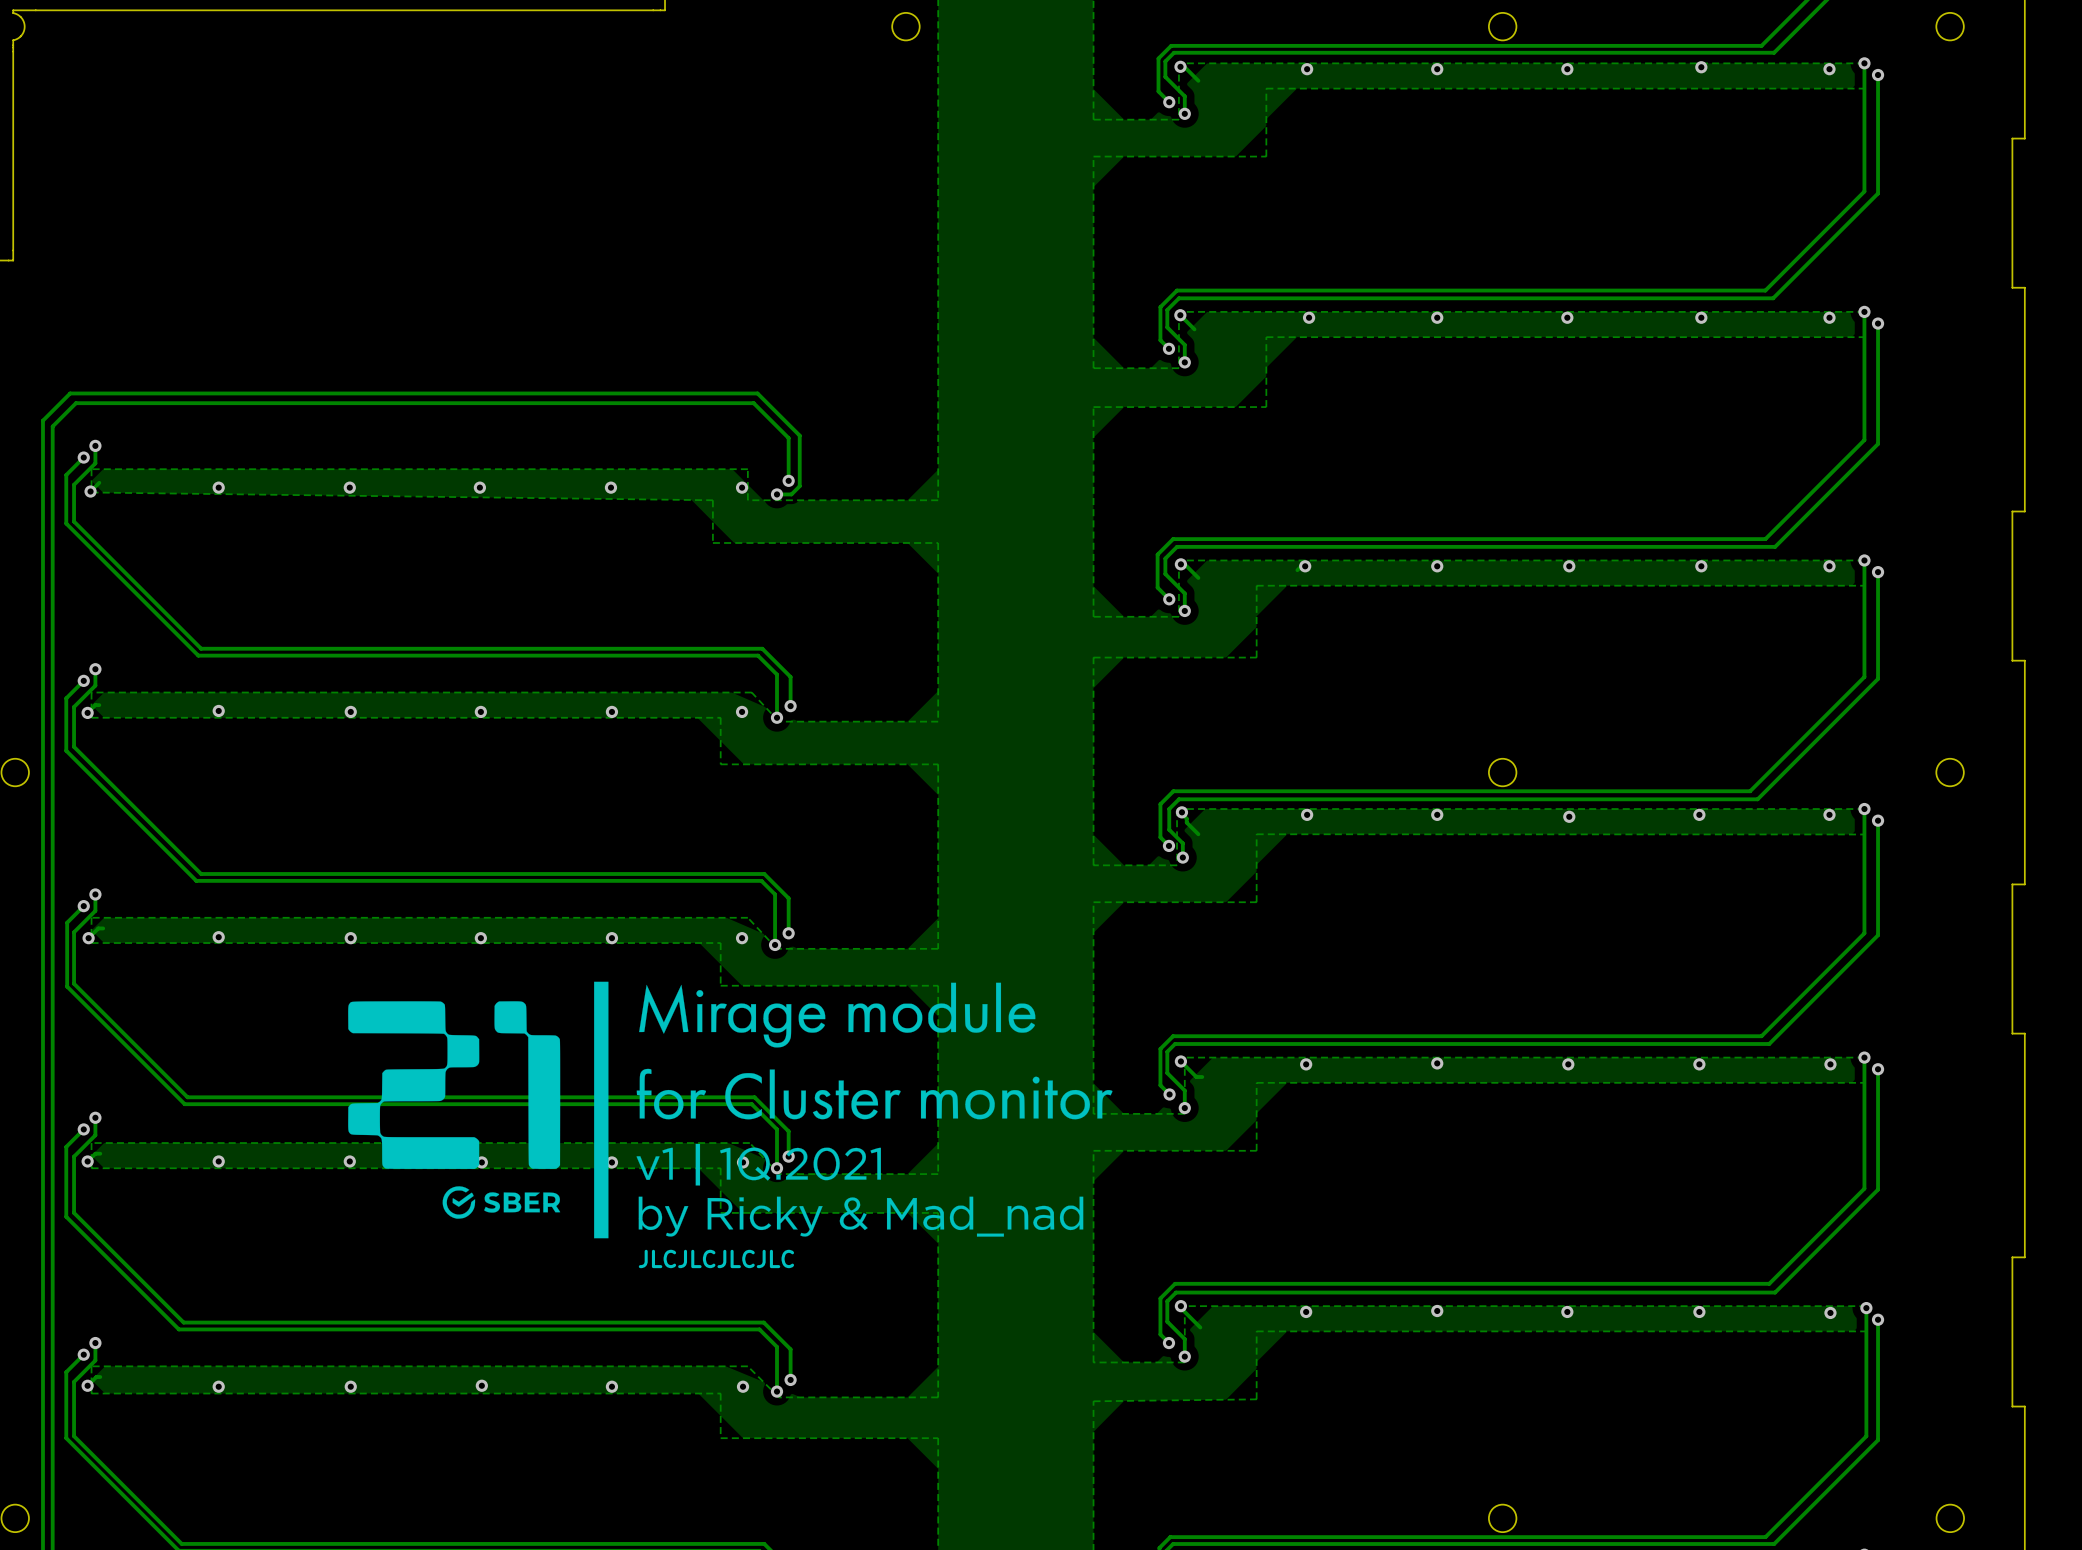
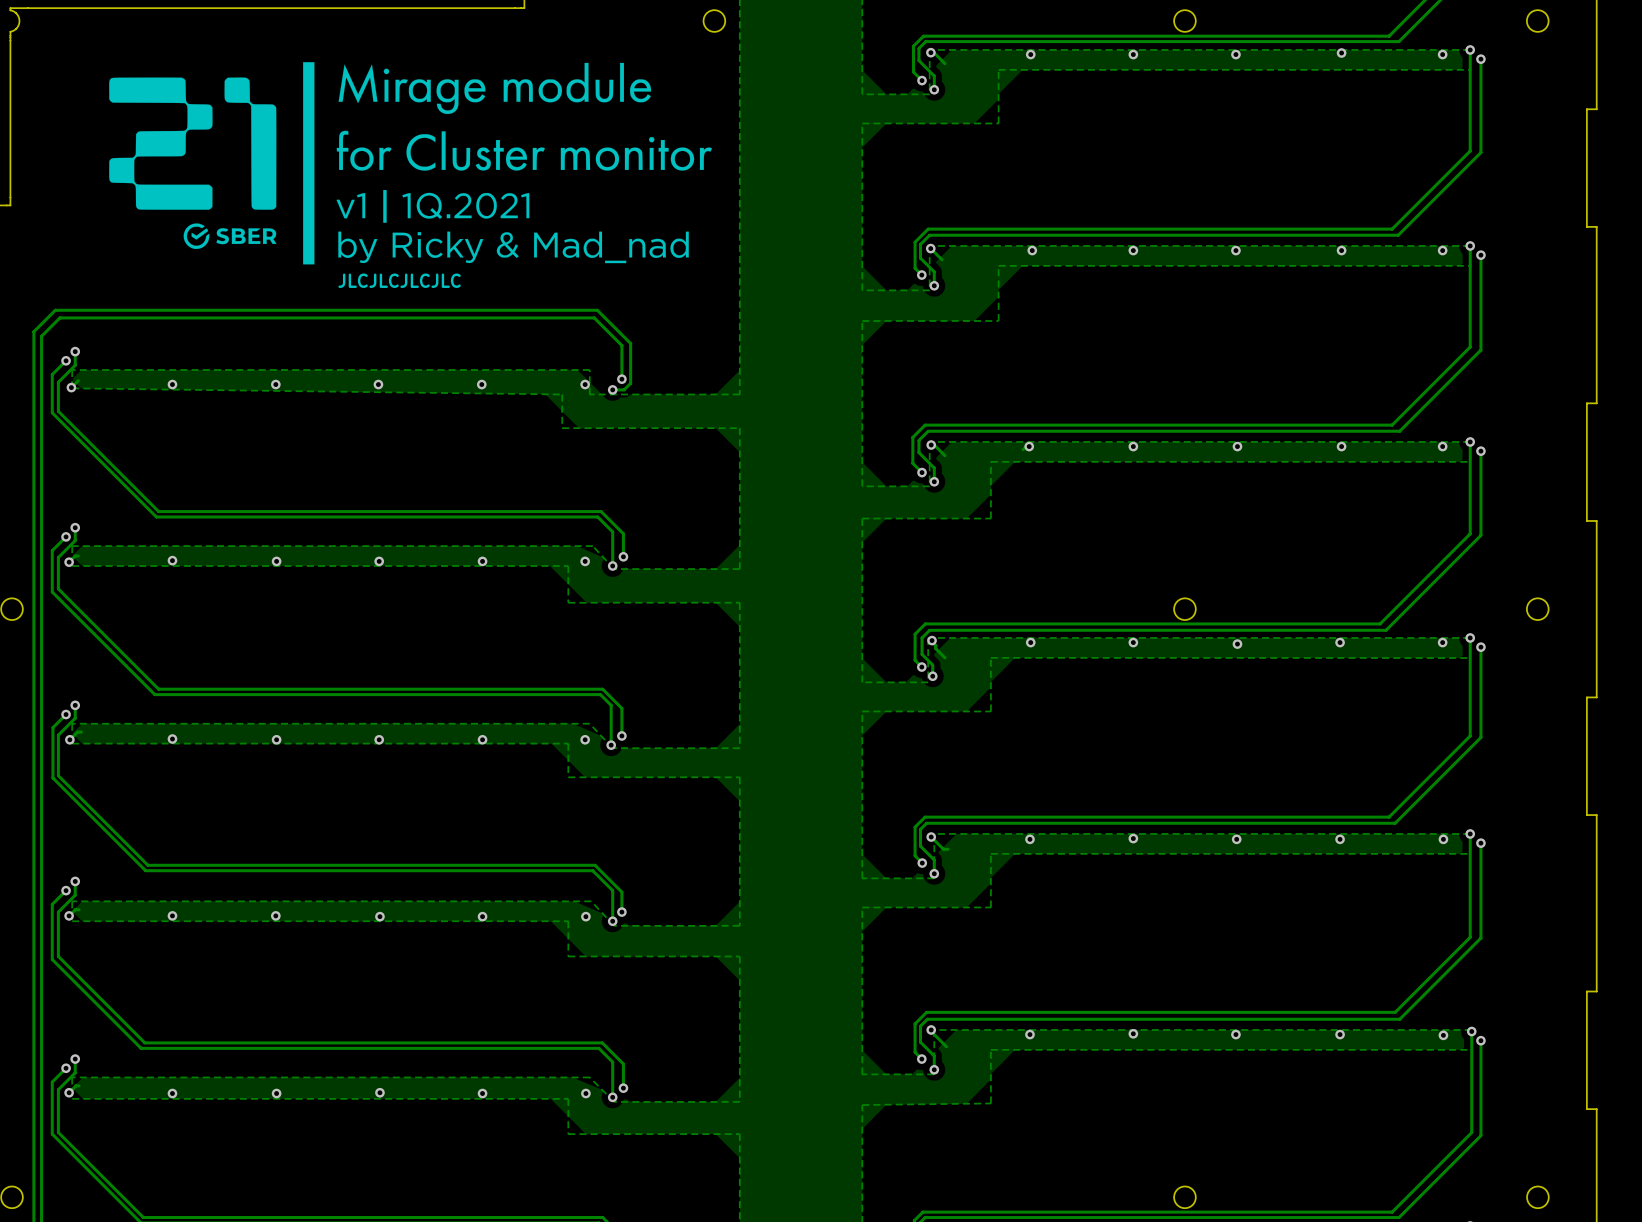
drawing: none -> [109, 62, 712, 265]
text: none -> JLCJLCJLCJLC (399, 280)
drawing: [348, 981, 1113, 1239] -> none
text: JLCJLCJLCJLC (716, 1258) -> none

